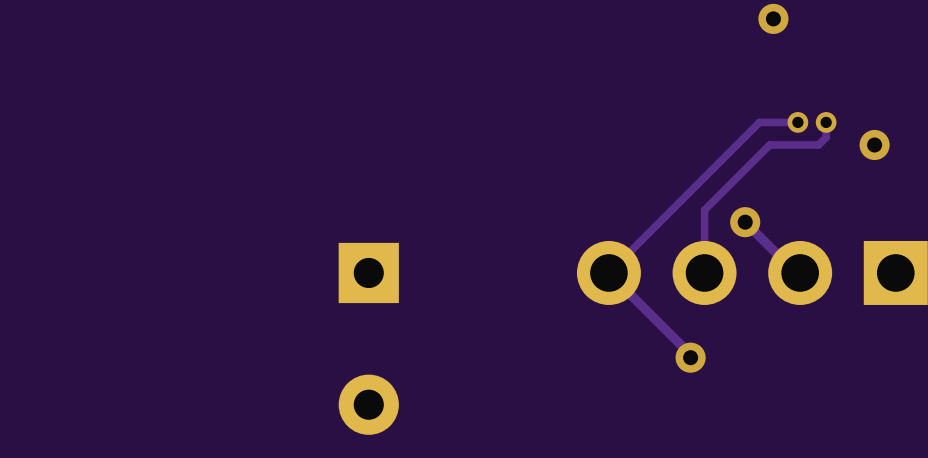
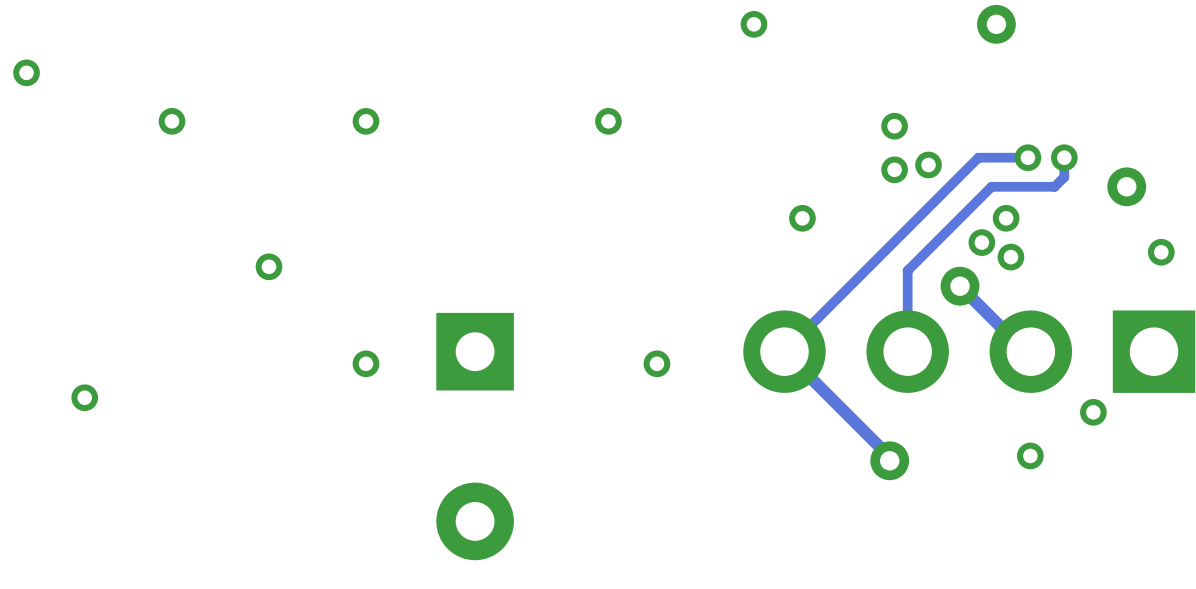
via: none -> (753, 24)
via: none -> (26, 72)
via: none -> (172, 121)
via: none -> (365, 121)
via: none -> (608, 121)
via: none -> (894, 126)
via: none -> (928, 164)
via: none -> (894, 169)
via: none -> (802, 218)
via: none -> (1006, 218)
via: none -> (981, 242)
via: none -> (1161, 252)
via: none -> (1010, 257)
via: none -> (268, 266)
via: none -> (365, 363)
via: none -> (656, 363)
via: none -> (84, 397)
via: none -> (1093, 412)
via: none -> (1030, 455)

